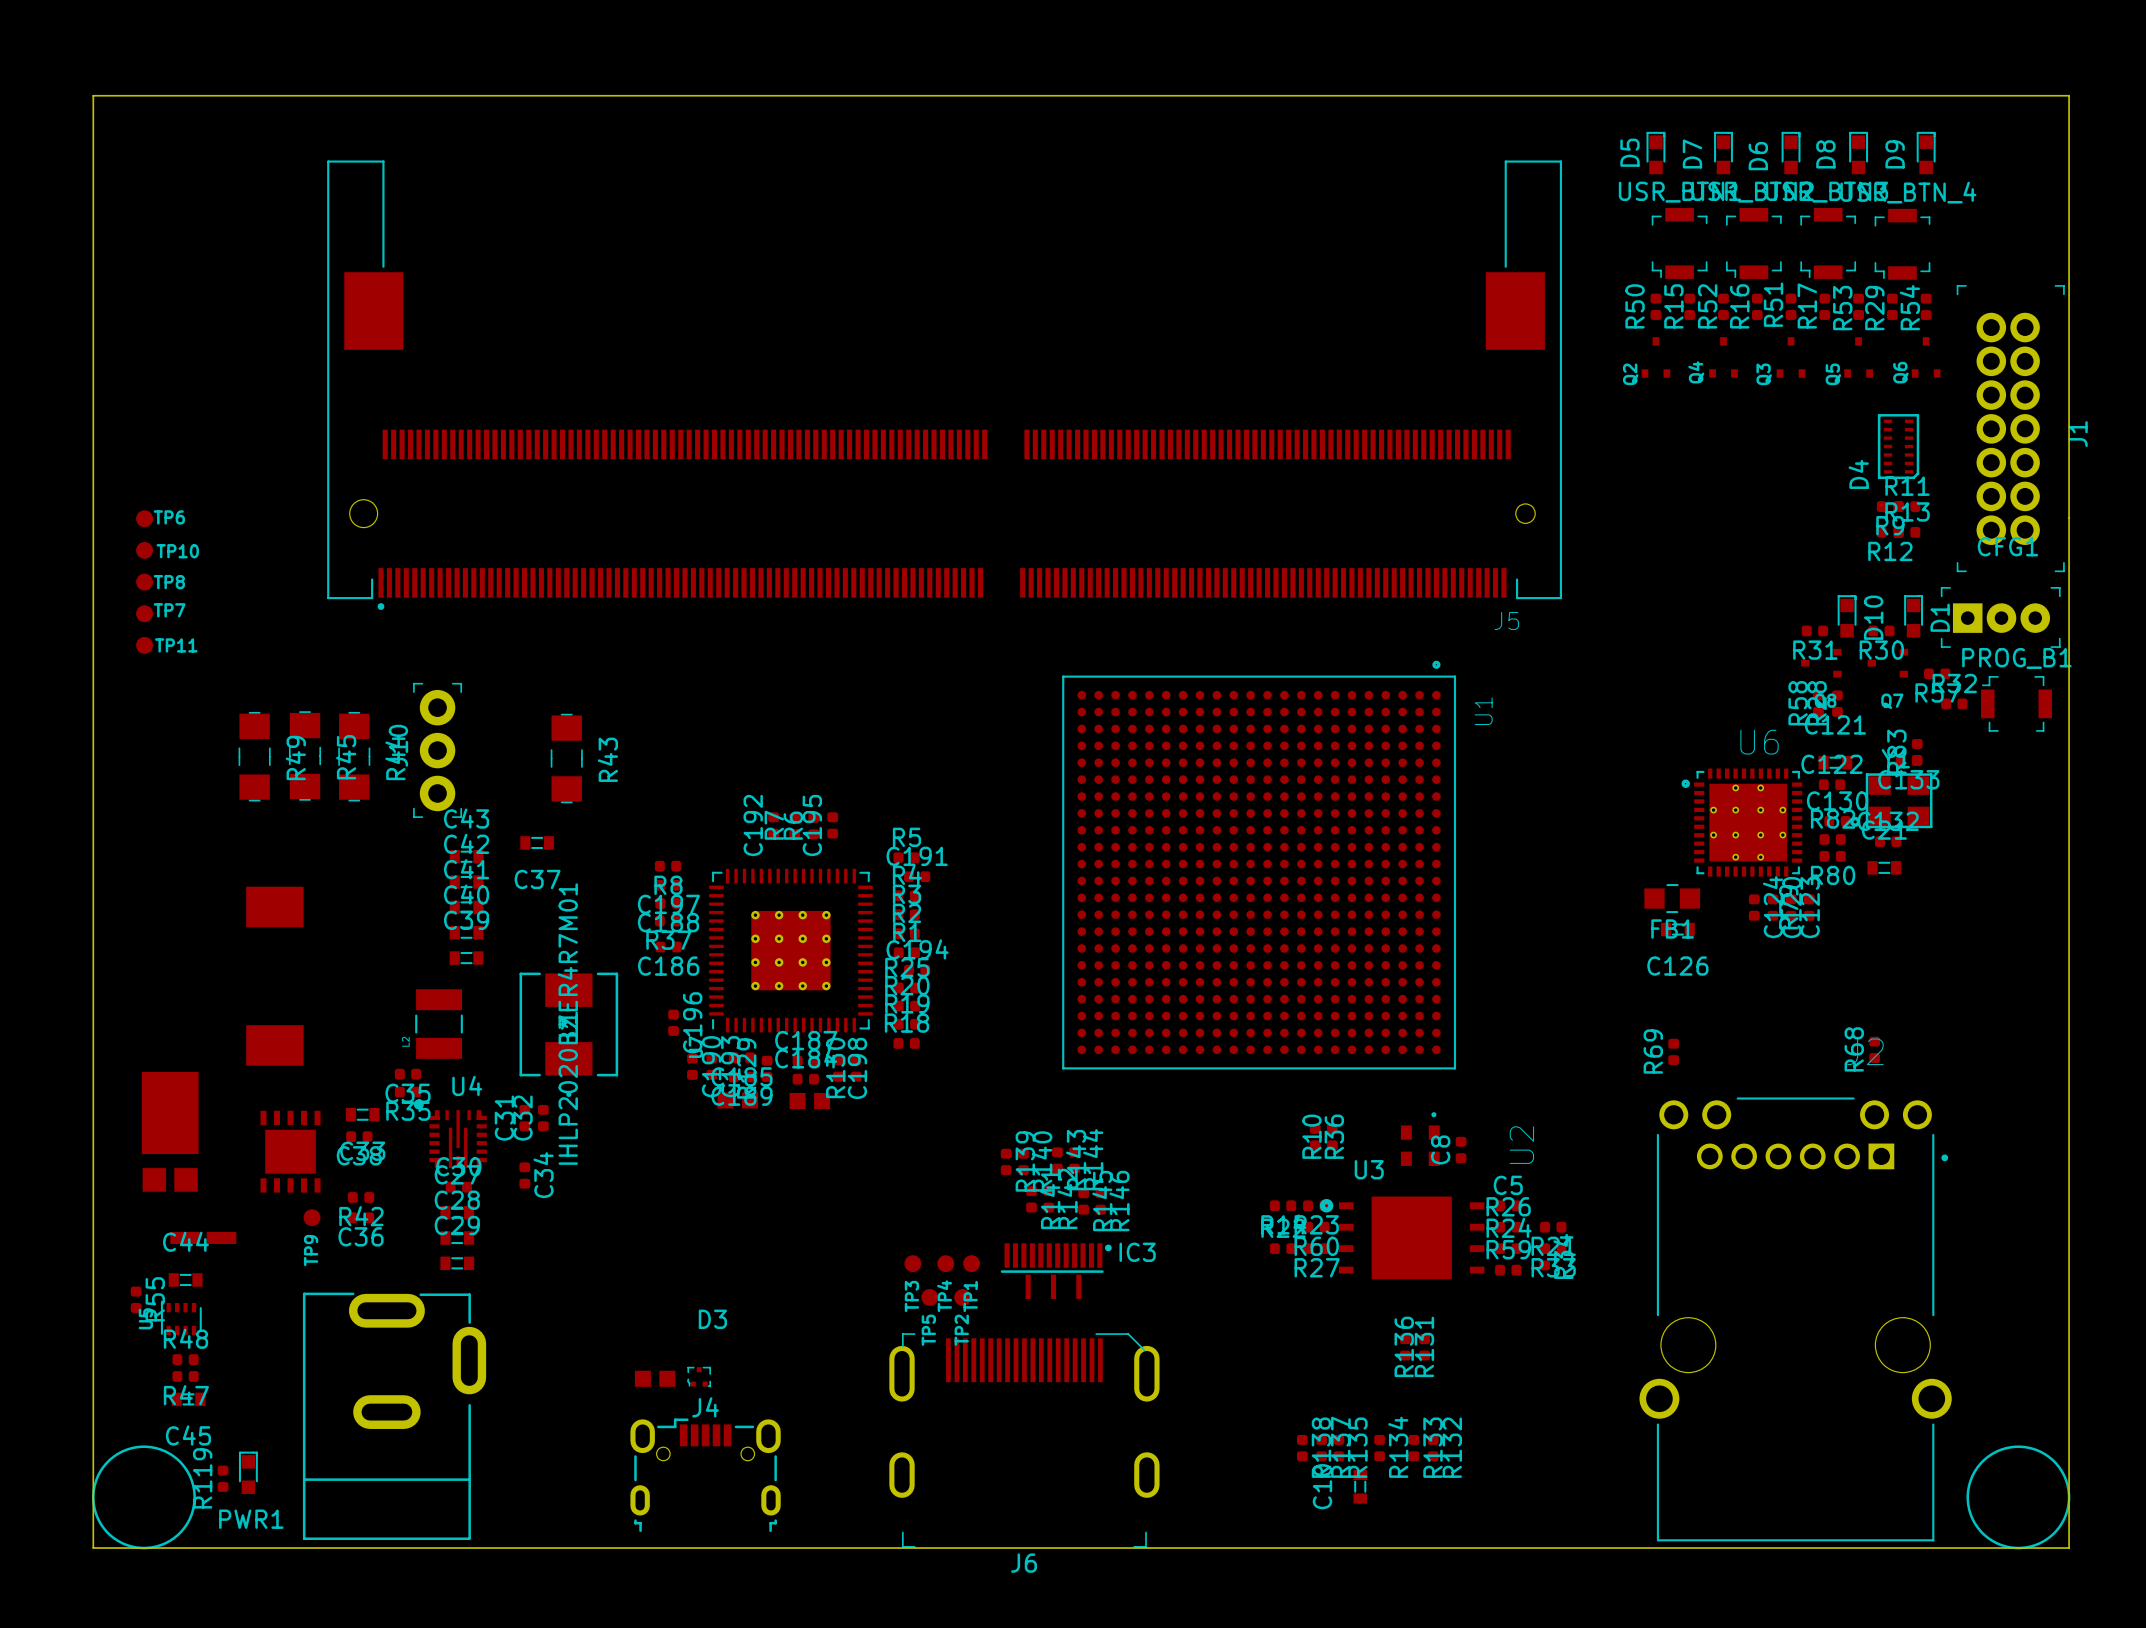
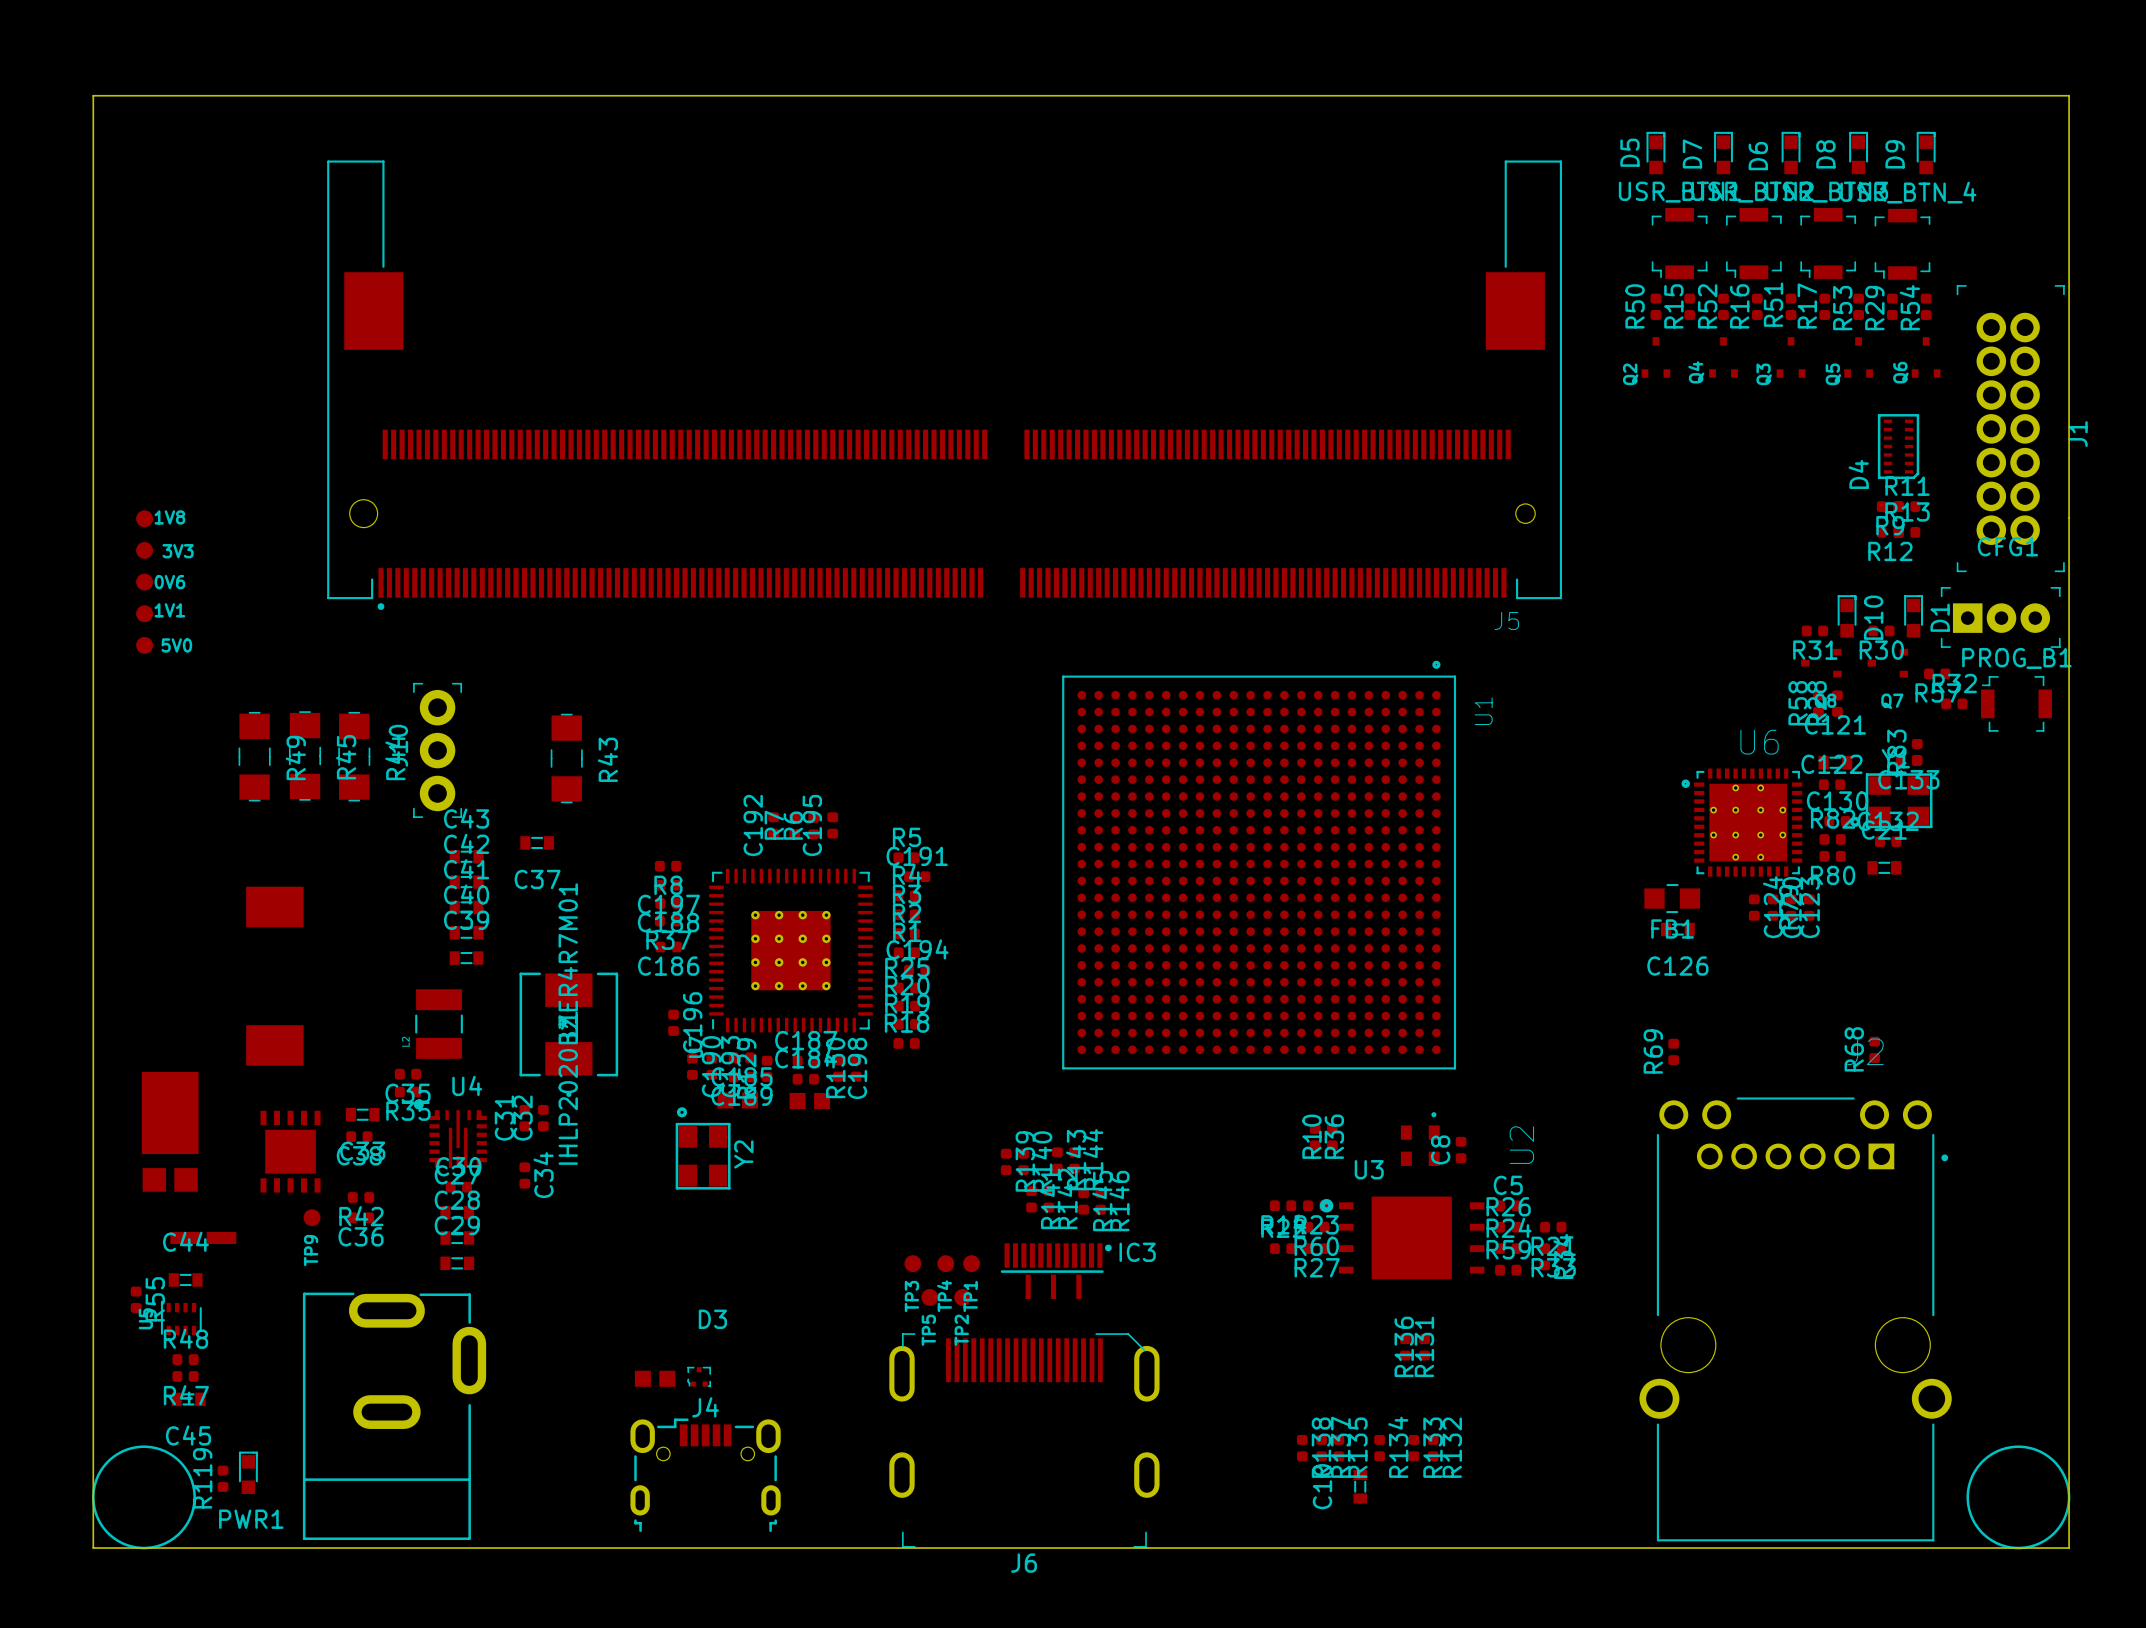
TP6 name: TP6 (169, 517) -> 1V8 (169, 517)
TP10 name: TP10 (177, 551) -> 3V3 (178, 551)
TP8 name: TP8 (169, 582) -> 0V6 (169, 582)
TP7 name: TP7 (169, 610) -> 1V1 (169, 610)
TP11 name: TP11 (176, 645) -> 5V0 (176, 645)
Y2: none -> (703, 1148)

